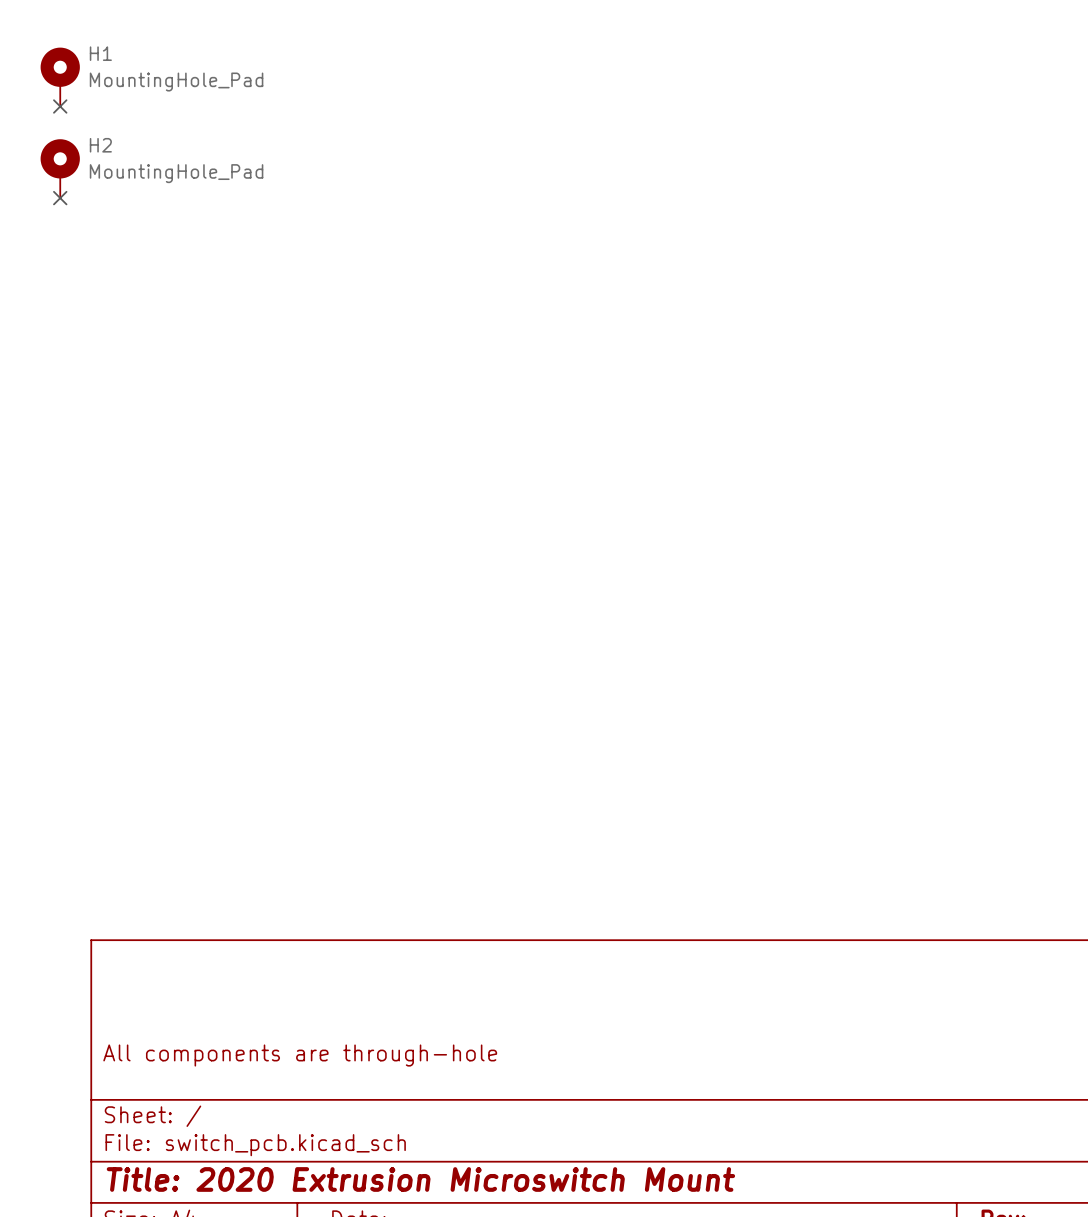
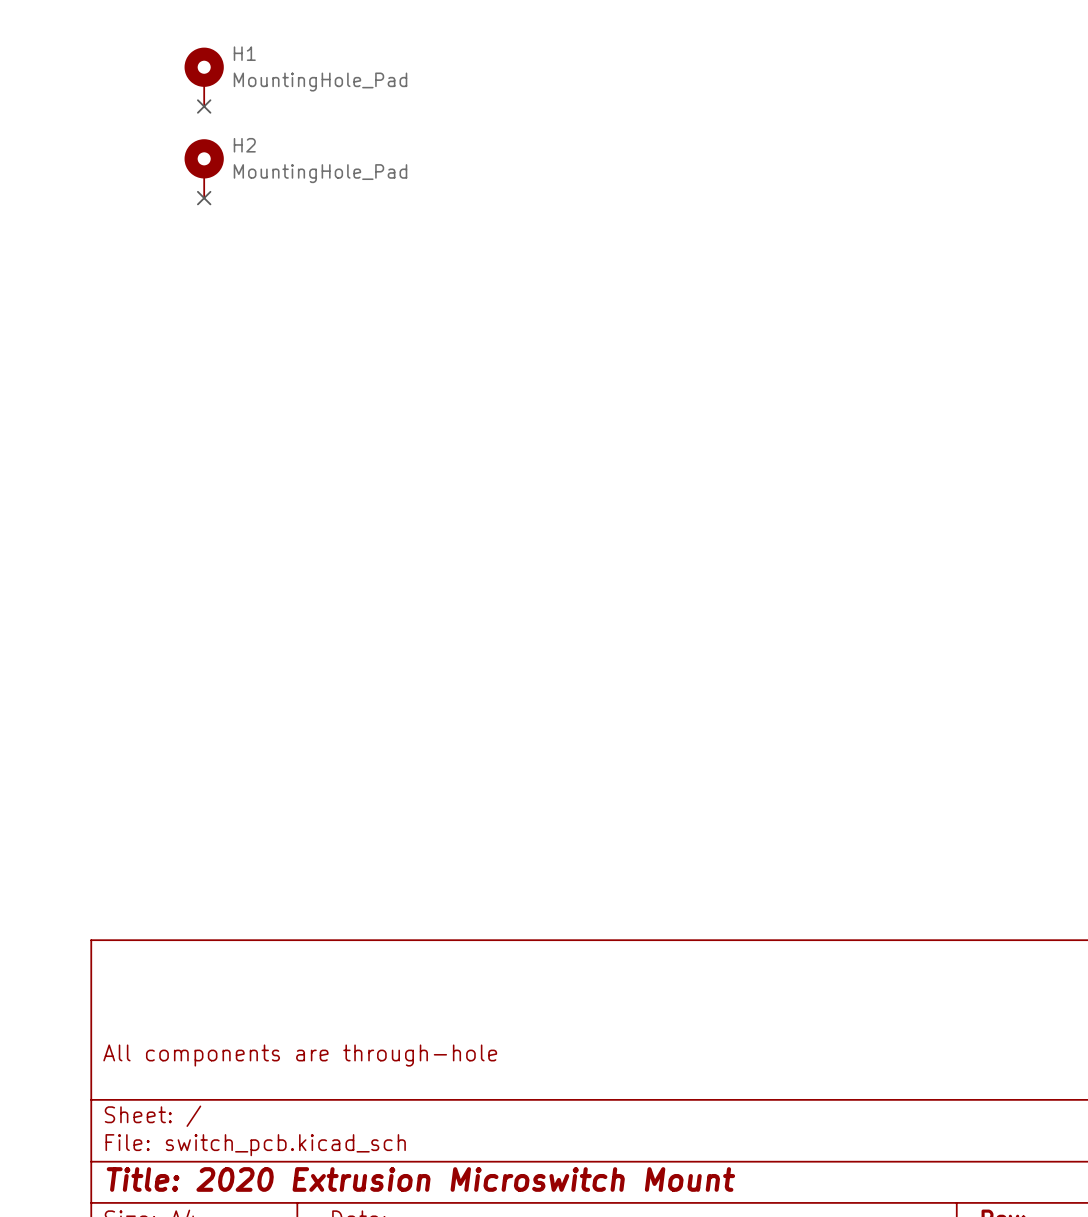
H1 position: (60, 77) -> (204, 77)
no-connect mark: (60, 106) -> none
no-connect mark: none -> (204, 106)
H2 position: (60, 168) -> (204, 168)
no-connect mark: (60, 198) -> none
no-connect mark: none -> (204, 198)

